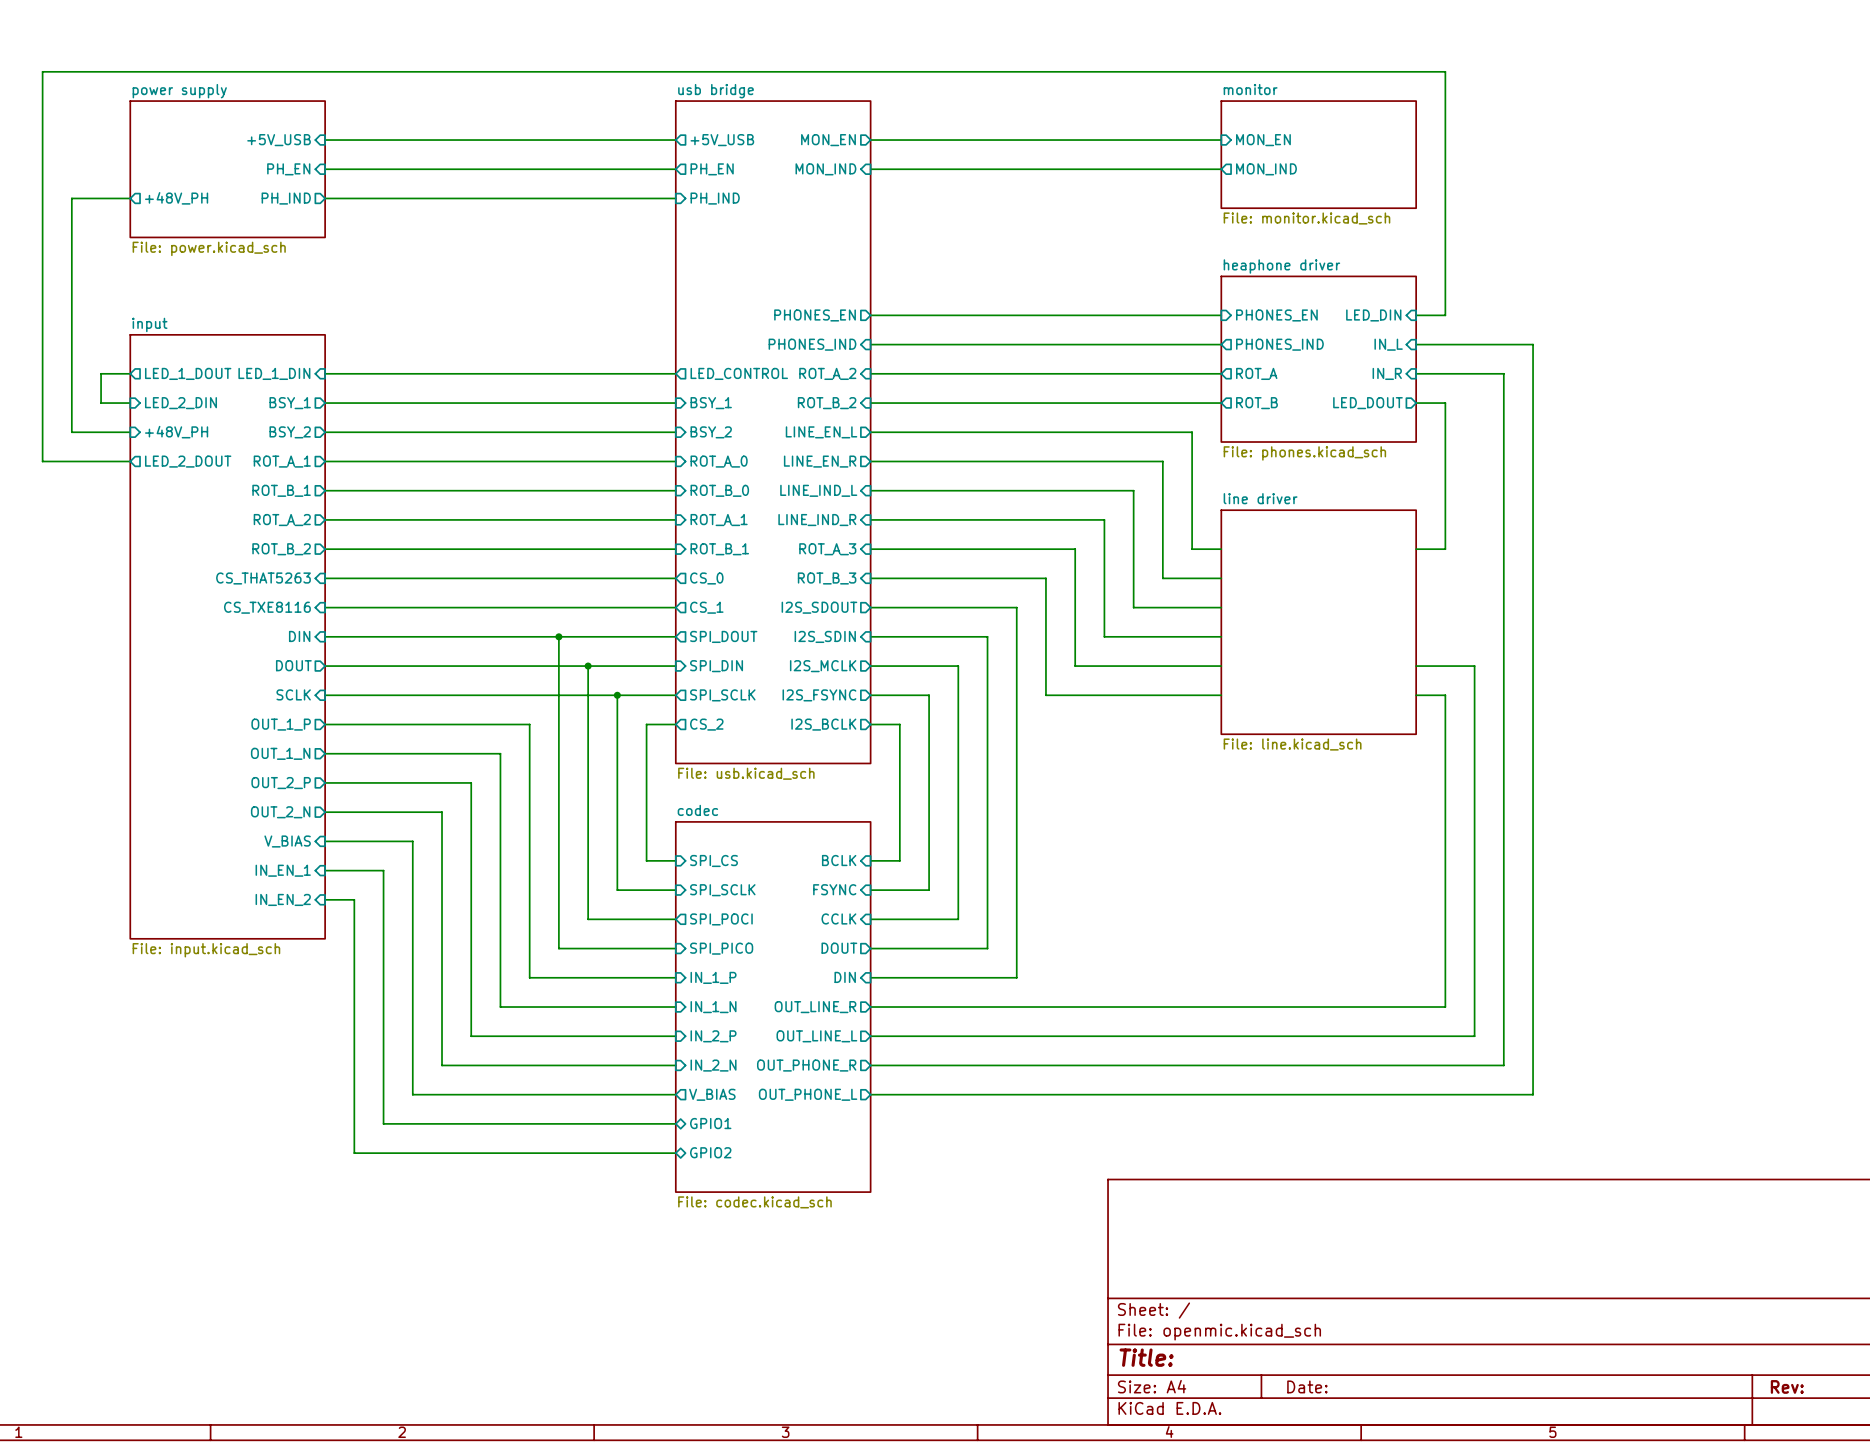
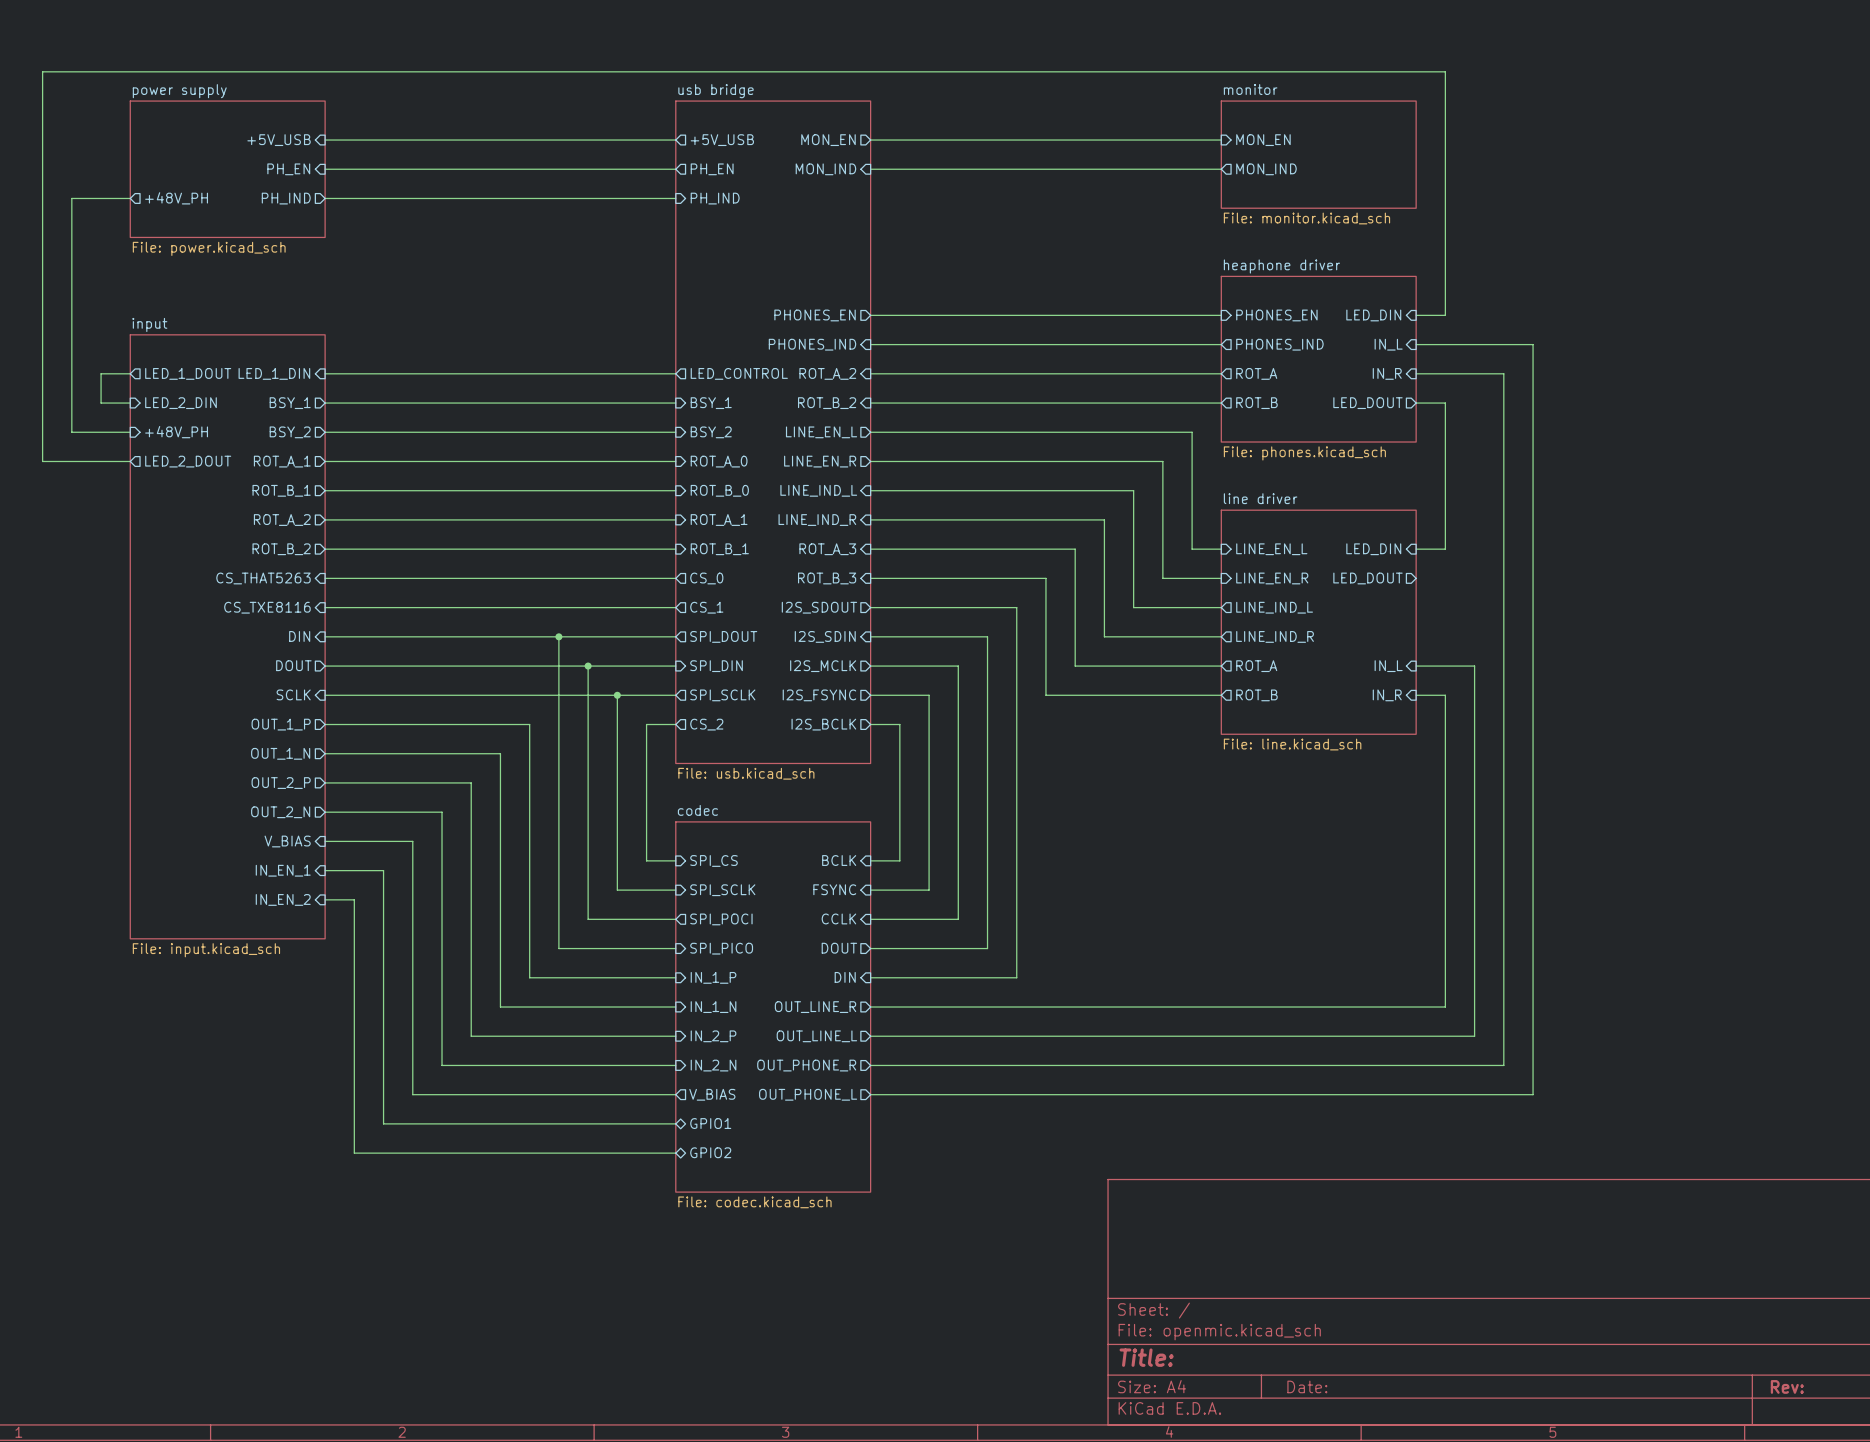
sheet pin: none -> LINE_EN_L (1271, 549)
sheet pin: none -> LED_DIN (1373, 549)
sheet pin: none -> LINE_EN_R (1272, 578)
sheet pin: none -> LED_DOUT (1367, 578)
sheet pin: none -> LINE_IND_L (1274, 607)
sheet pin: none -> LINE_IND_R (1275, 636)
sheet pin: none -> ROT_A (1256, 666)
sheet pin: none -> IN_L (1388, 666)
sheet pin: none -> ROT_B (1256, 695)
sheet pin: none -> IN_R (1387, 695)

